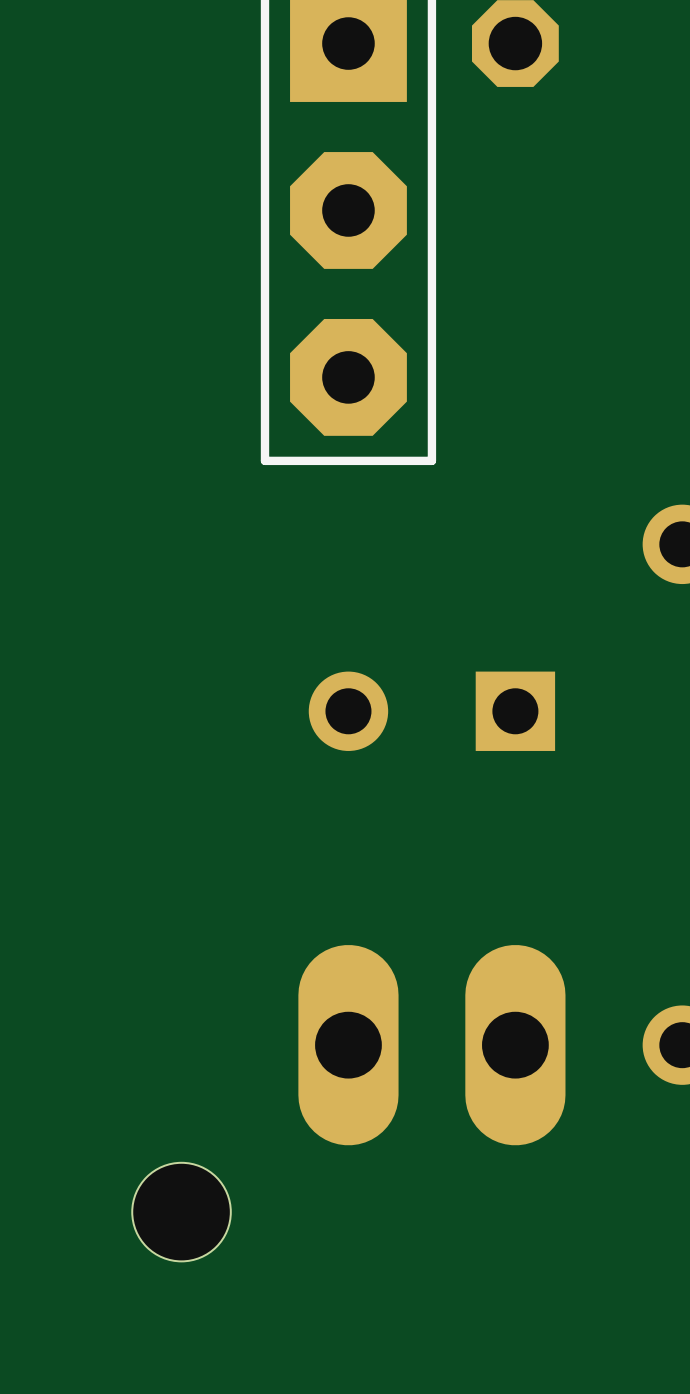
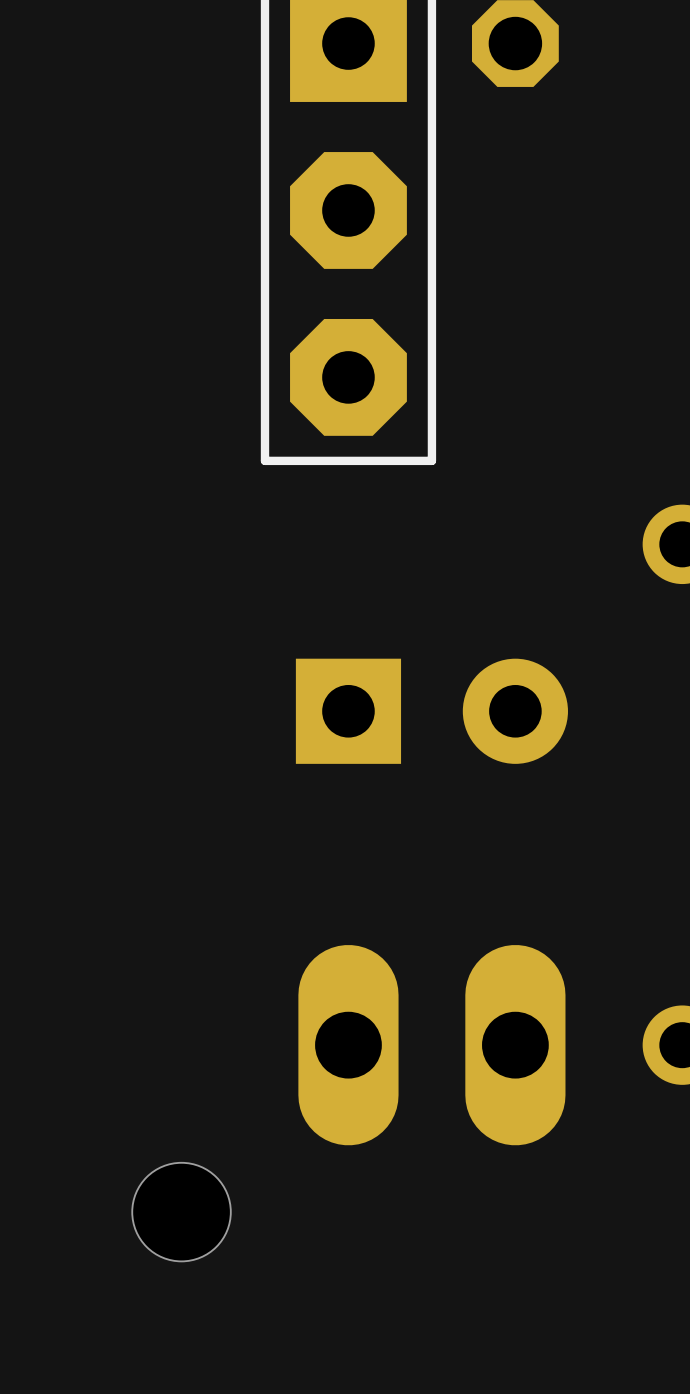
part footprint: [308, 671, 556, 751] -> [295, 658, 568, 764]

